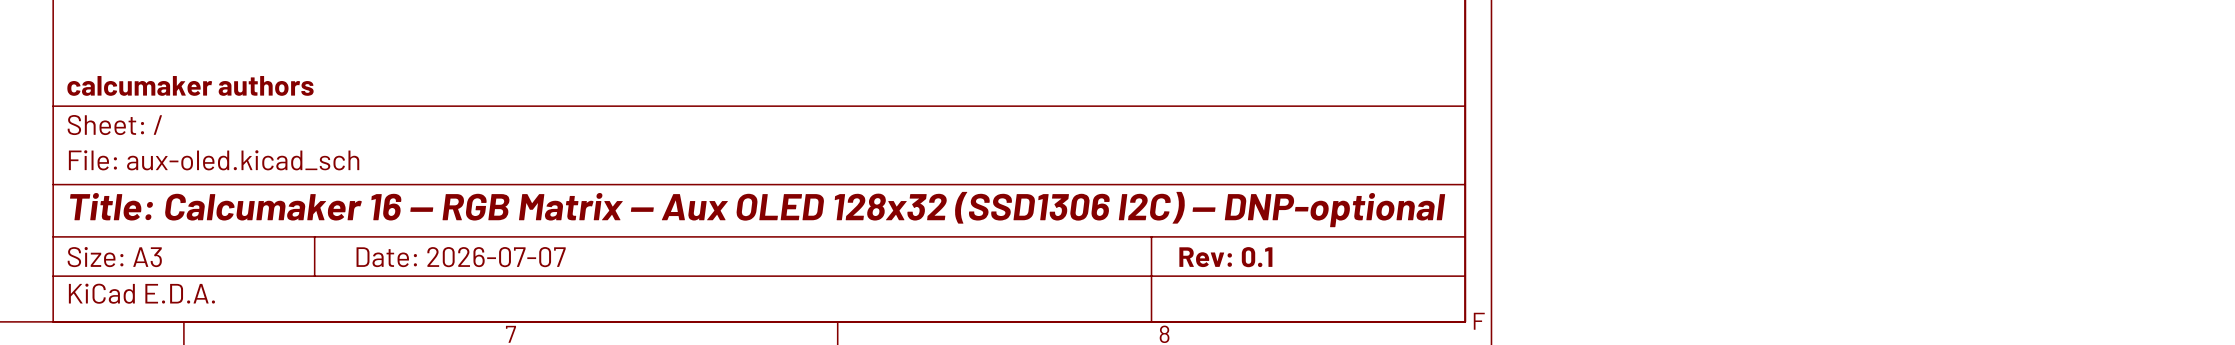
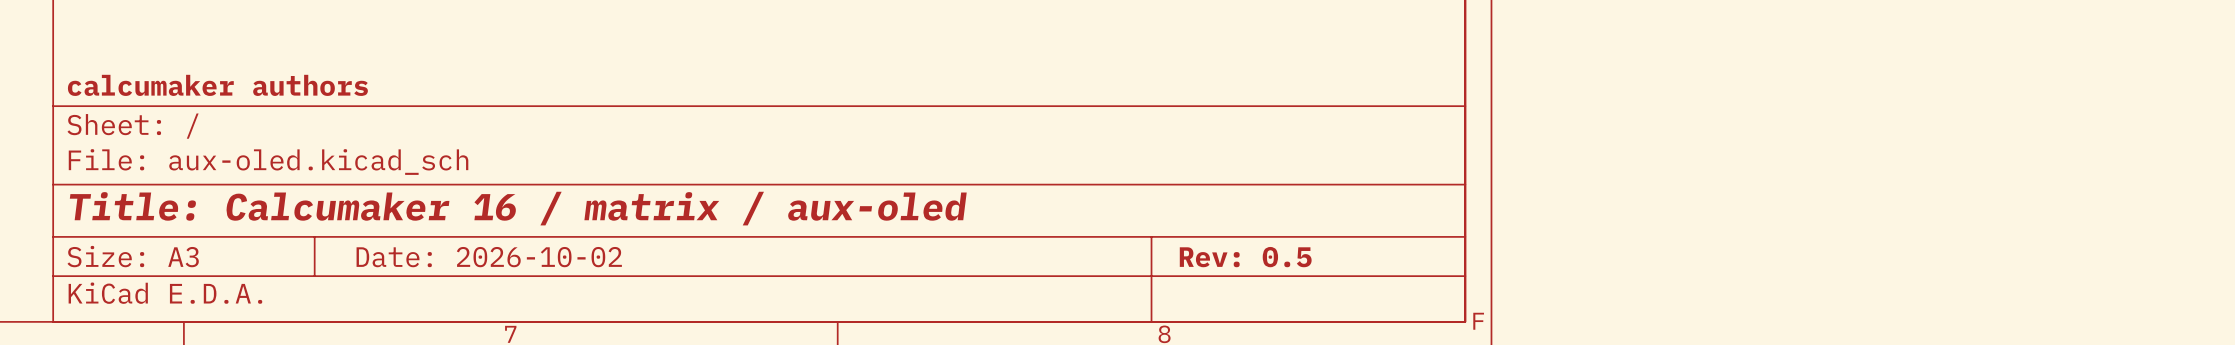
title block: Title: Calcumaker 16 — RGB Matrix — Aux OLED 128x32 (SSD1306 I2C) — DNP-optional (757, 209) -> Title: Calcumaker 16 / matrix / aux-oled (518, 208)
title block: Date: 2026-07-07 (461, 257) -> Date: 2026-10-02 (489, 257)
title block: Rev: 0.1 (1225, 257) -> Rev: 0.5 (1245, 257)

